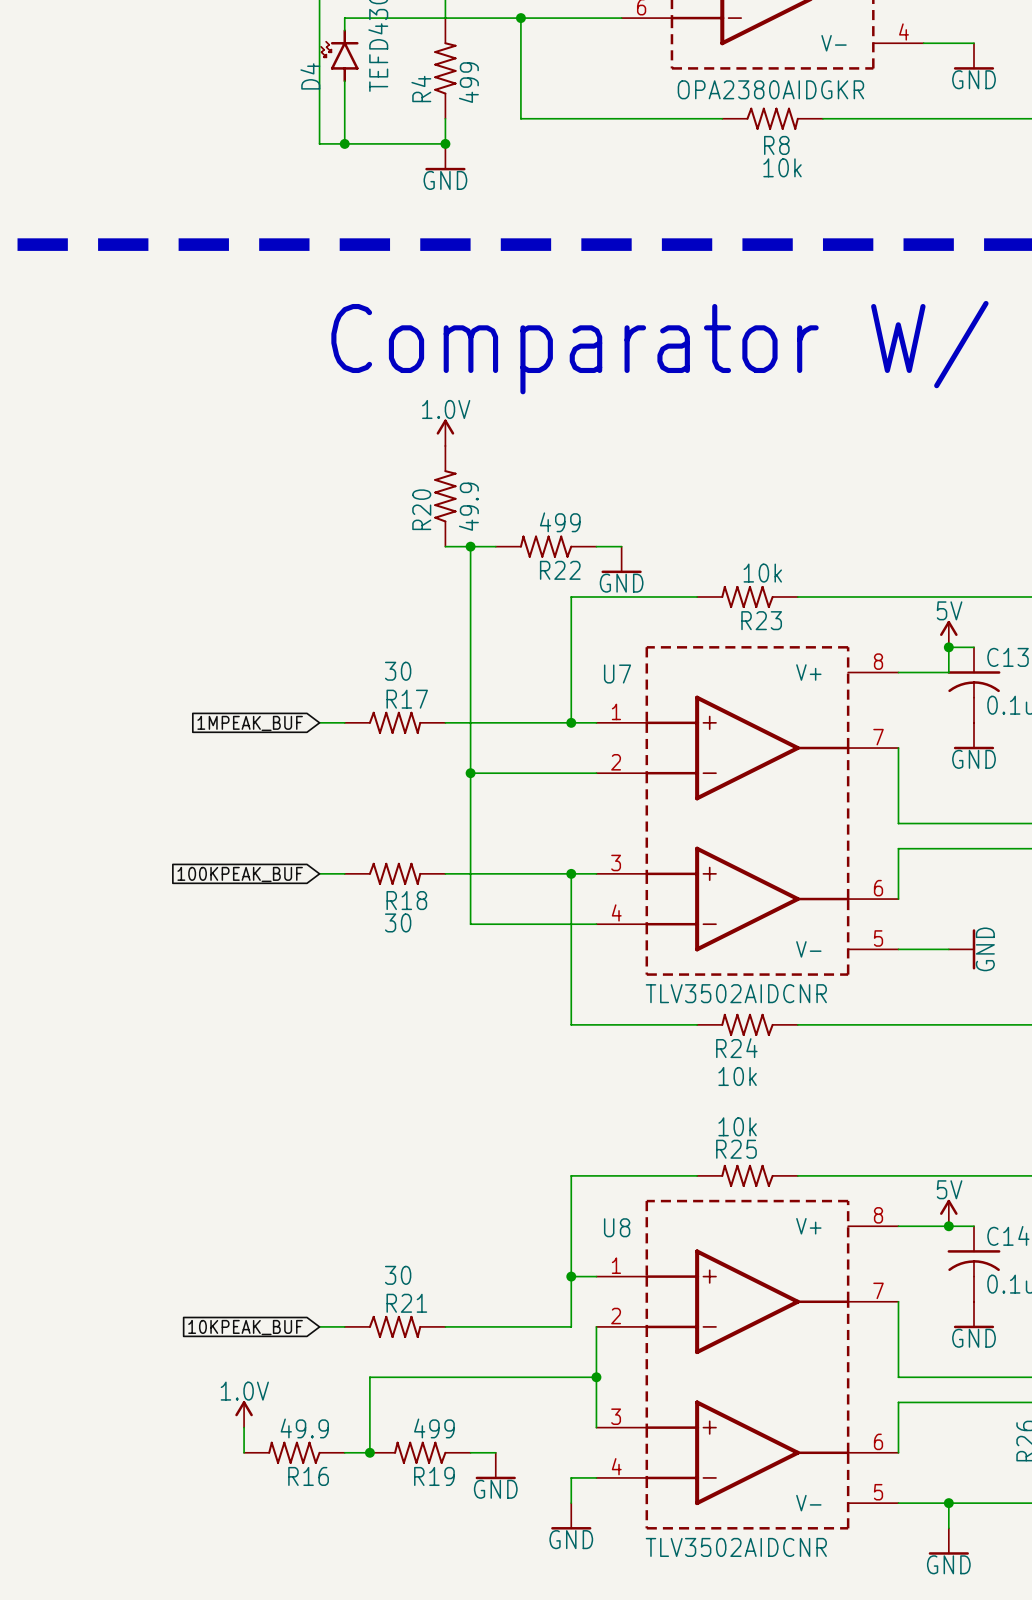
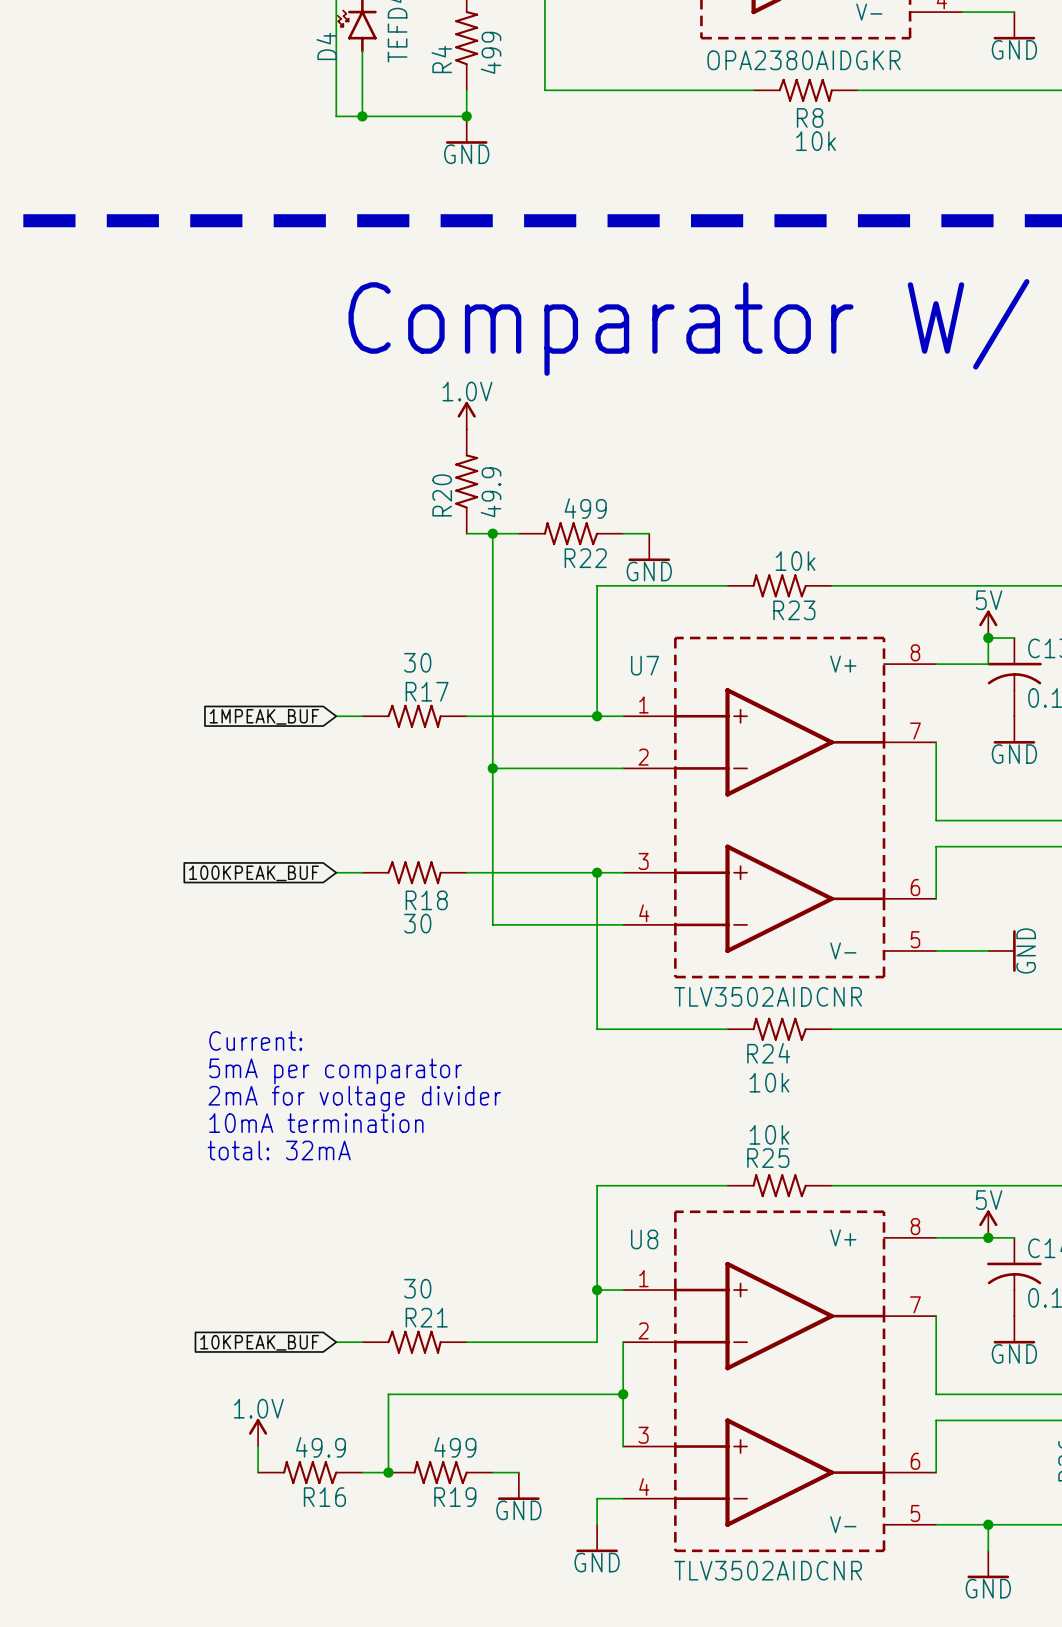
text: none -> Current: (255, 1040)
text: none -> 5mA per comparator (335, 1071)
text: none -> 2mA for voltage divider (354, 1098)
text: none -> 10mA termination (316, 1123)
text: none -> total: 32mA (279, 1150)

